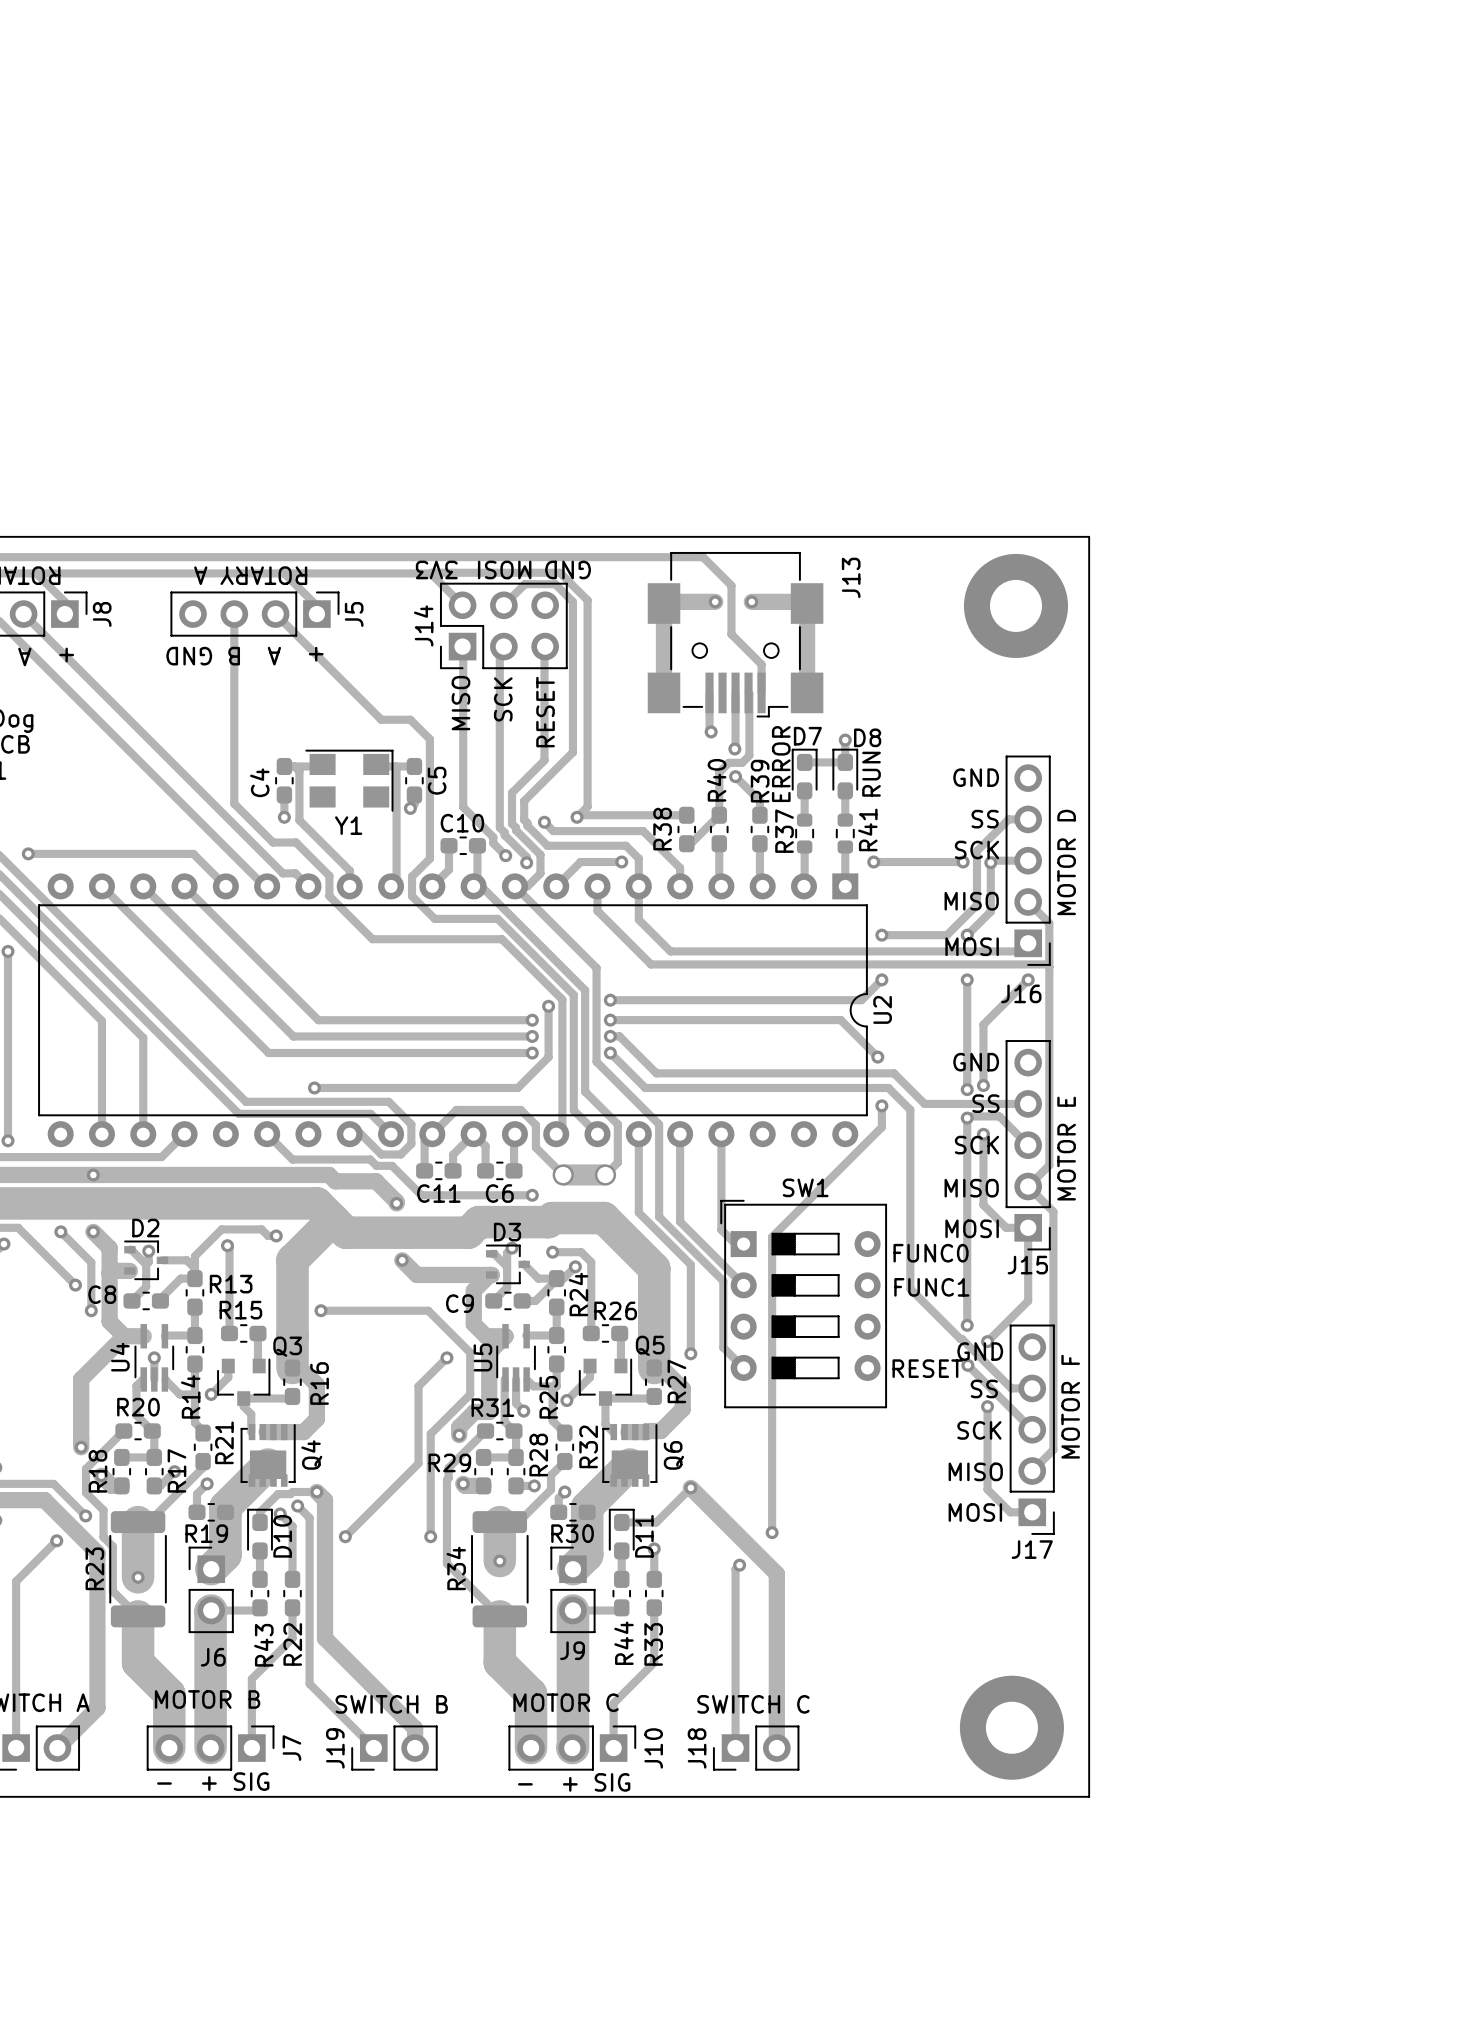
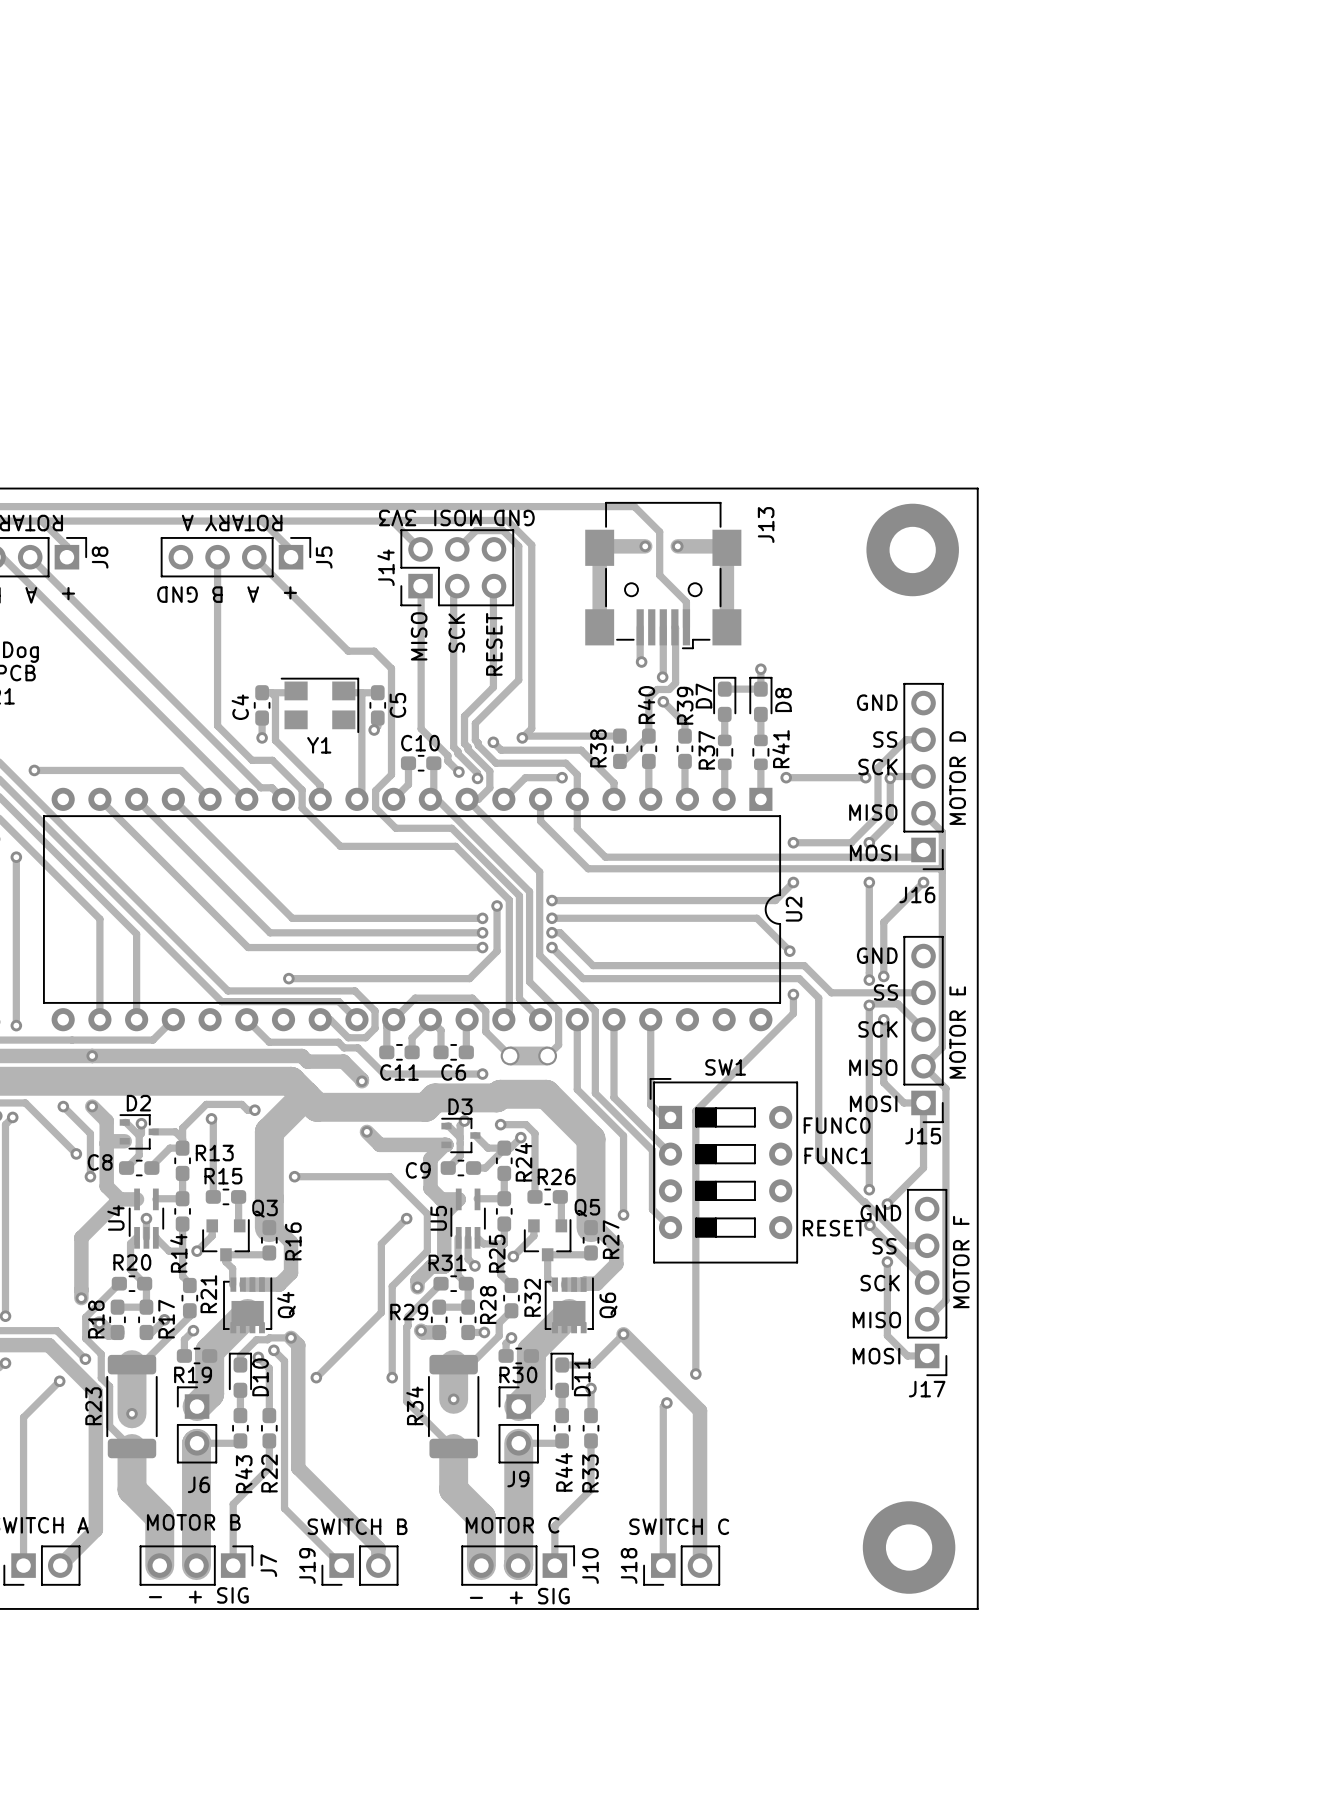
D7 name rotation: 0° (807, 736) -> 90° counterclockwise (703, 696)
D7 name position: D7 (807, 736) -> D7 (703, 696)
D8 name rotation: 0° (867, 737) -> 90° counterclockwise (783, 699)
text: ERROR (781, 764) -> none
text: RUN (871, 774) -> none

